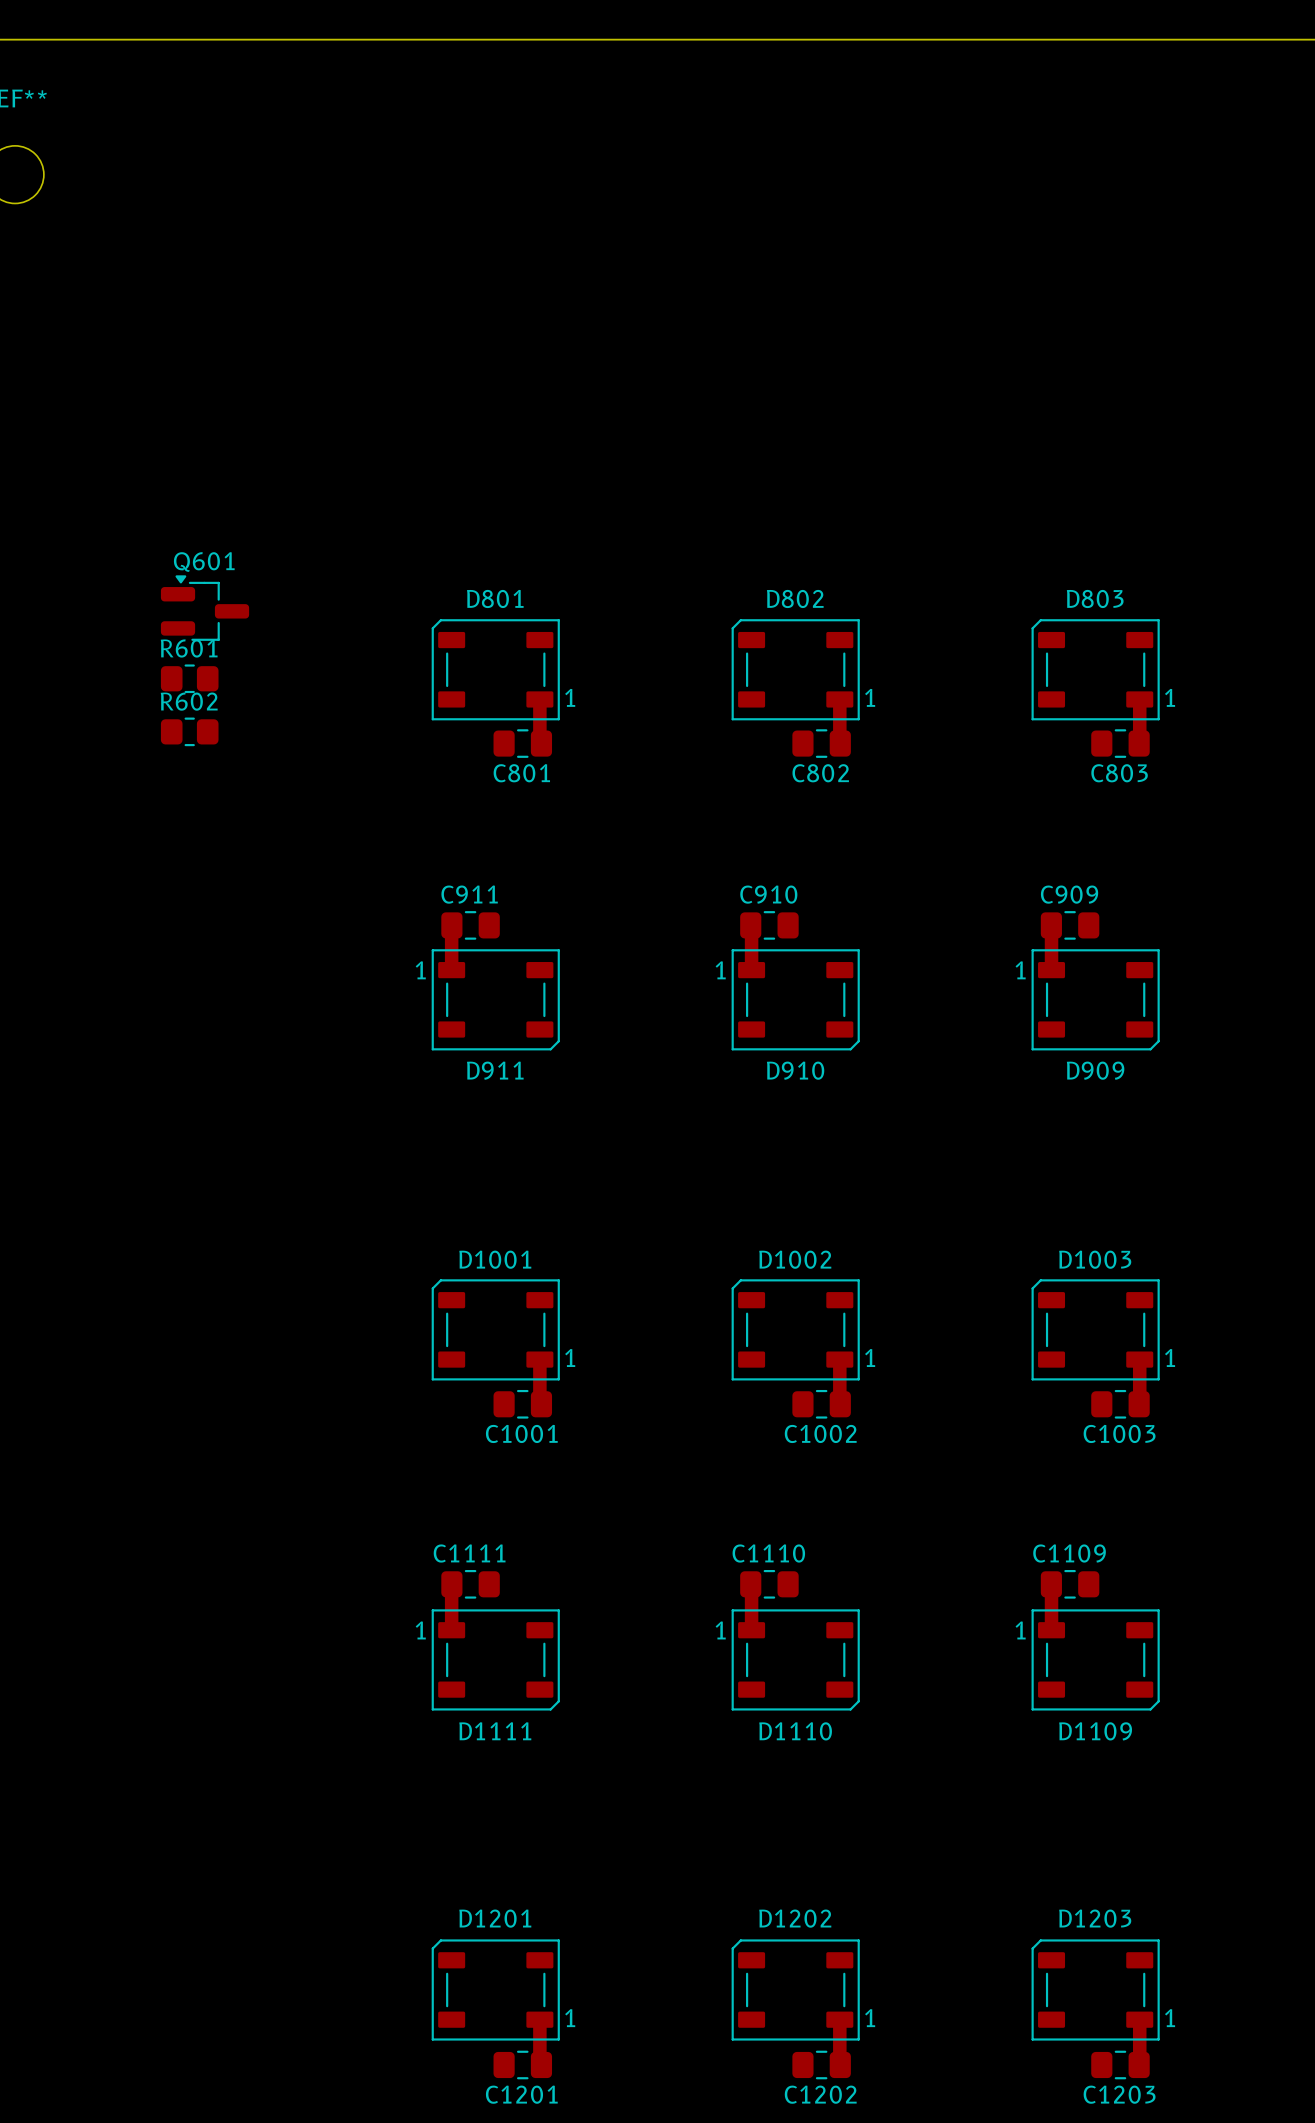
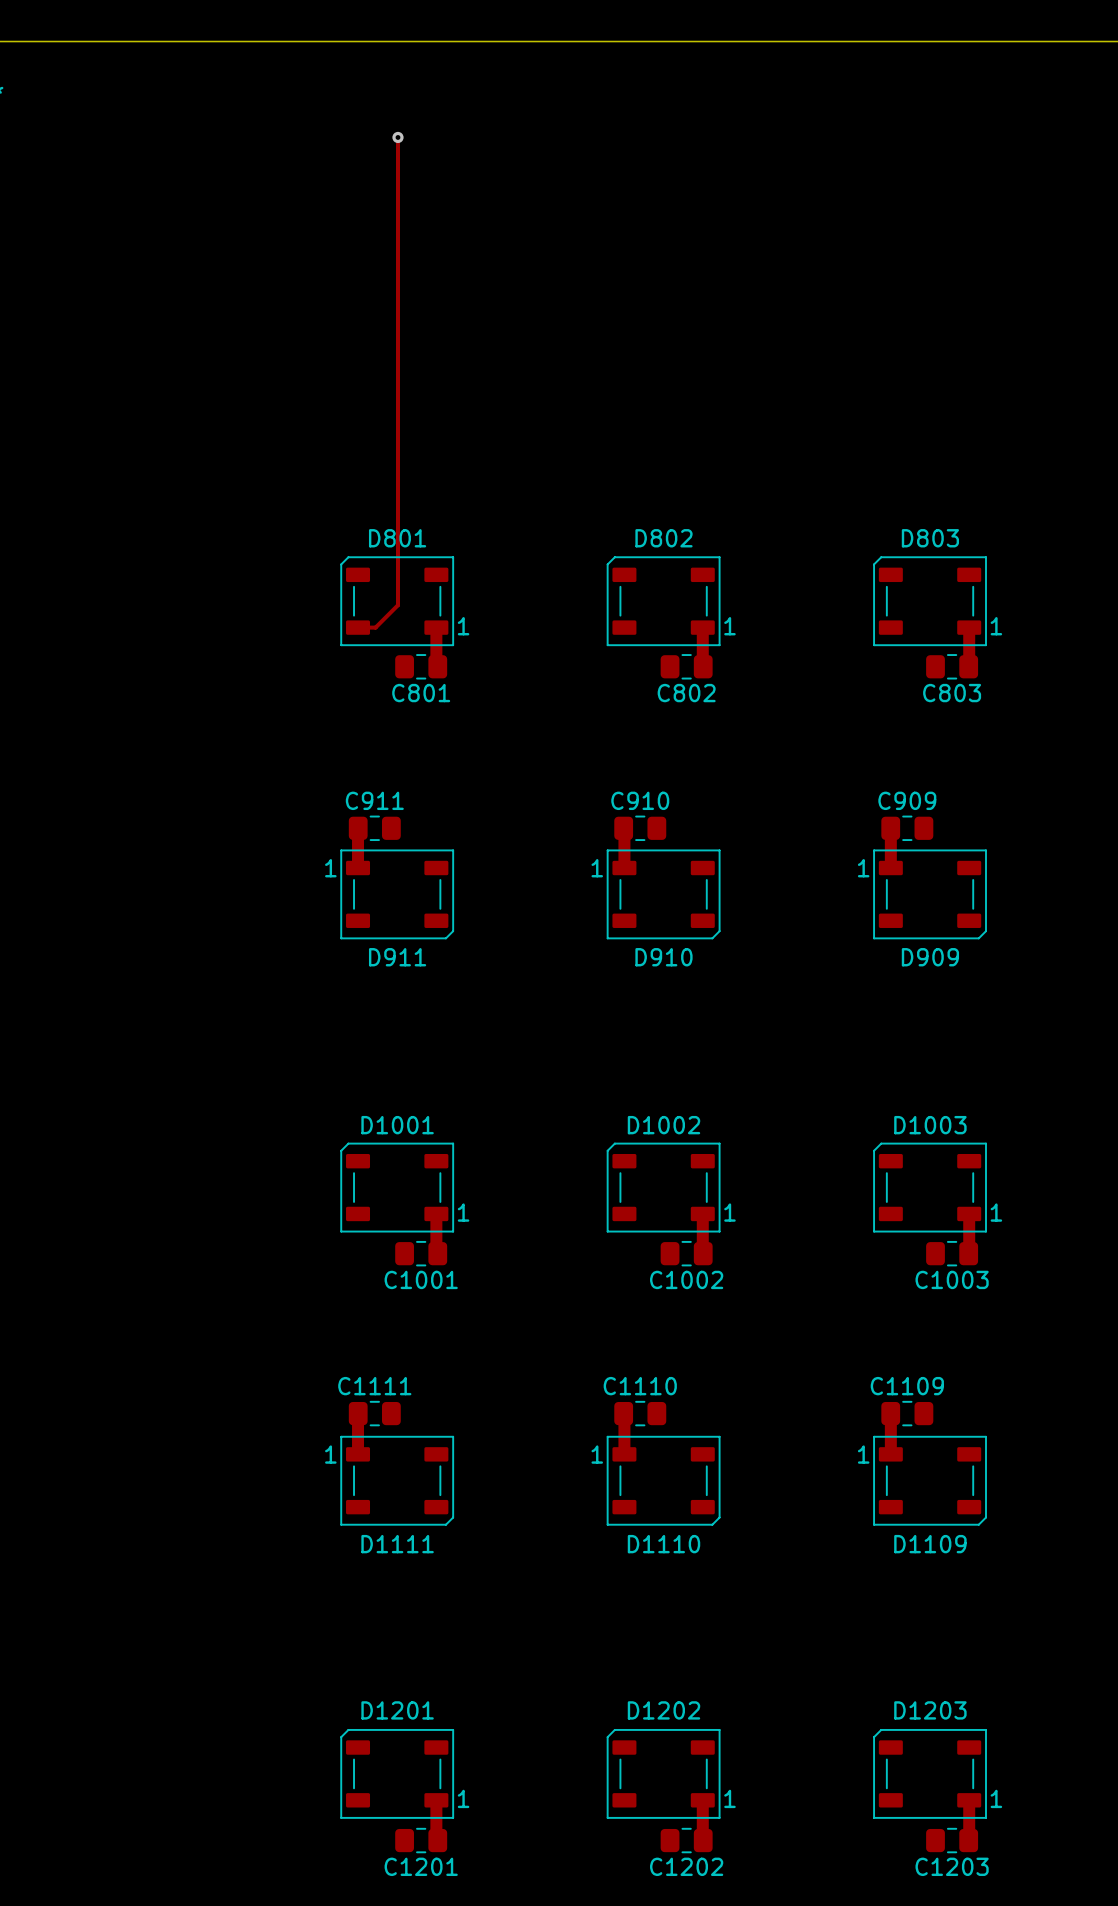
track: none -> (397, 137) (397, 605) (375, 627) (358, 627)
via: none -> (397, 137)
Q601: (205, 608) -> none
R601: (189, 678) -> none
R602: (189, 731) -> none

